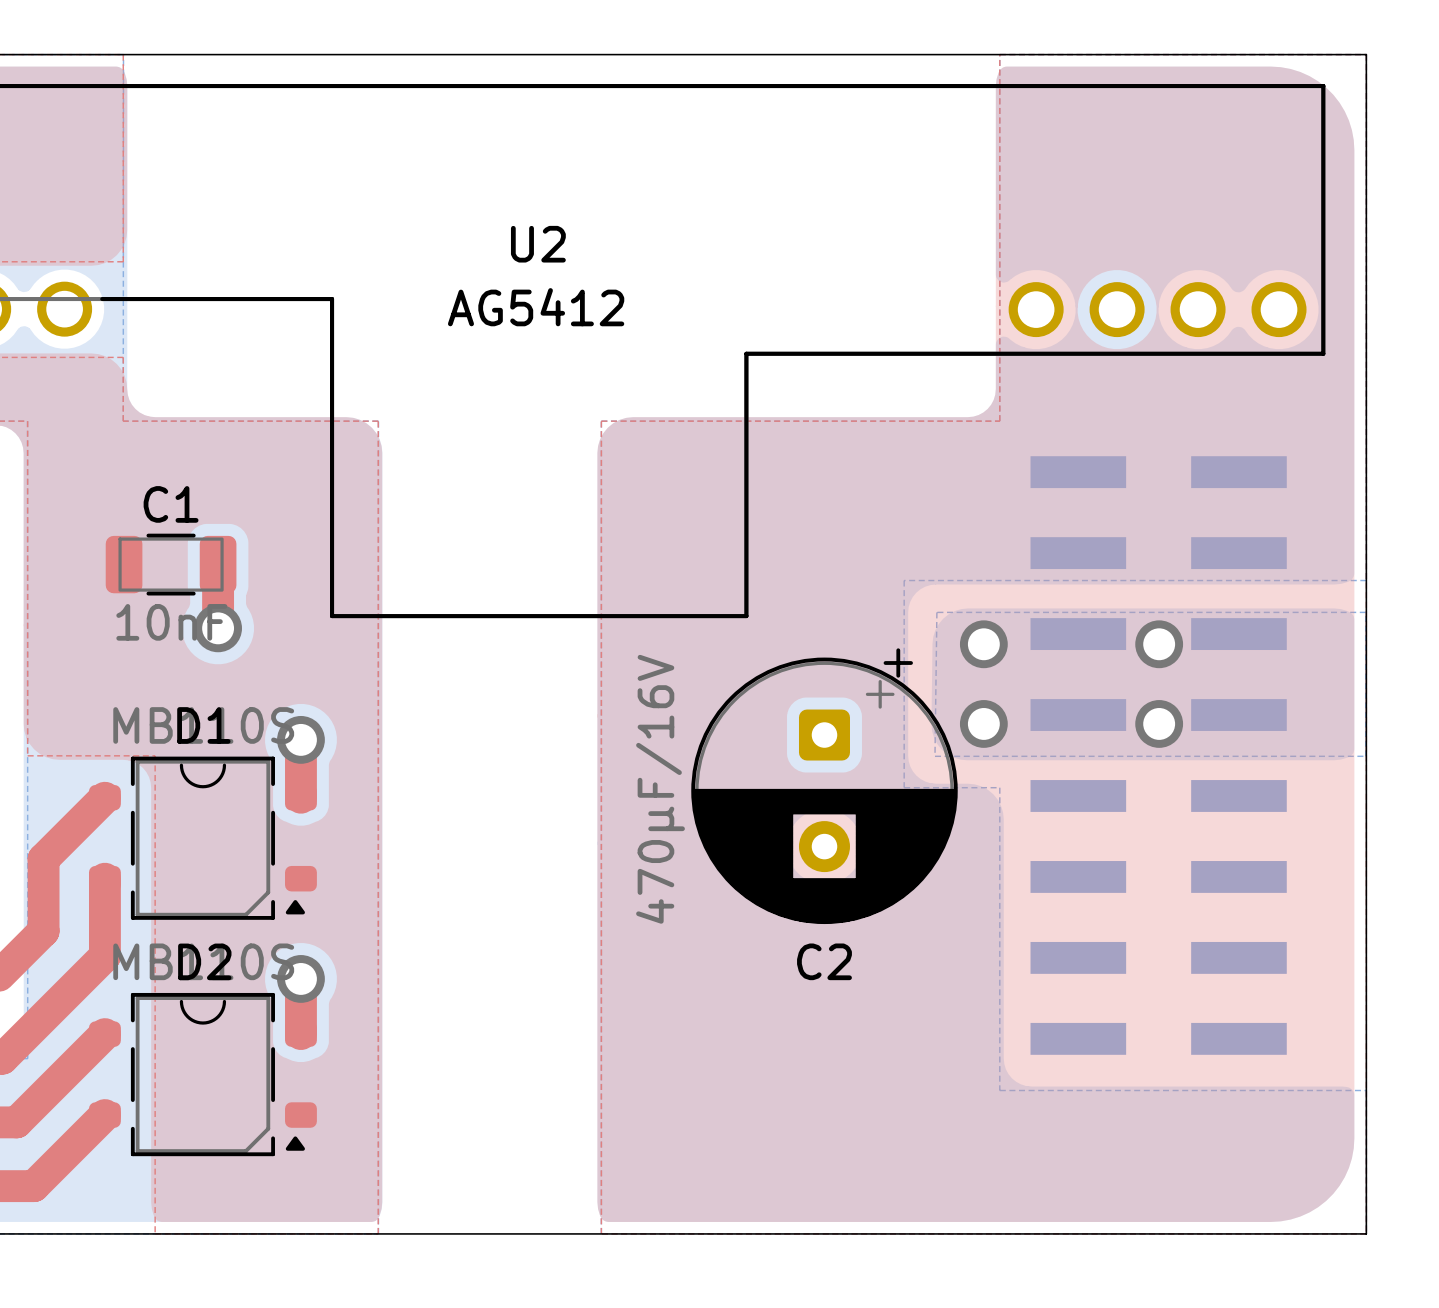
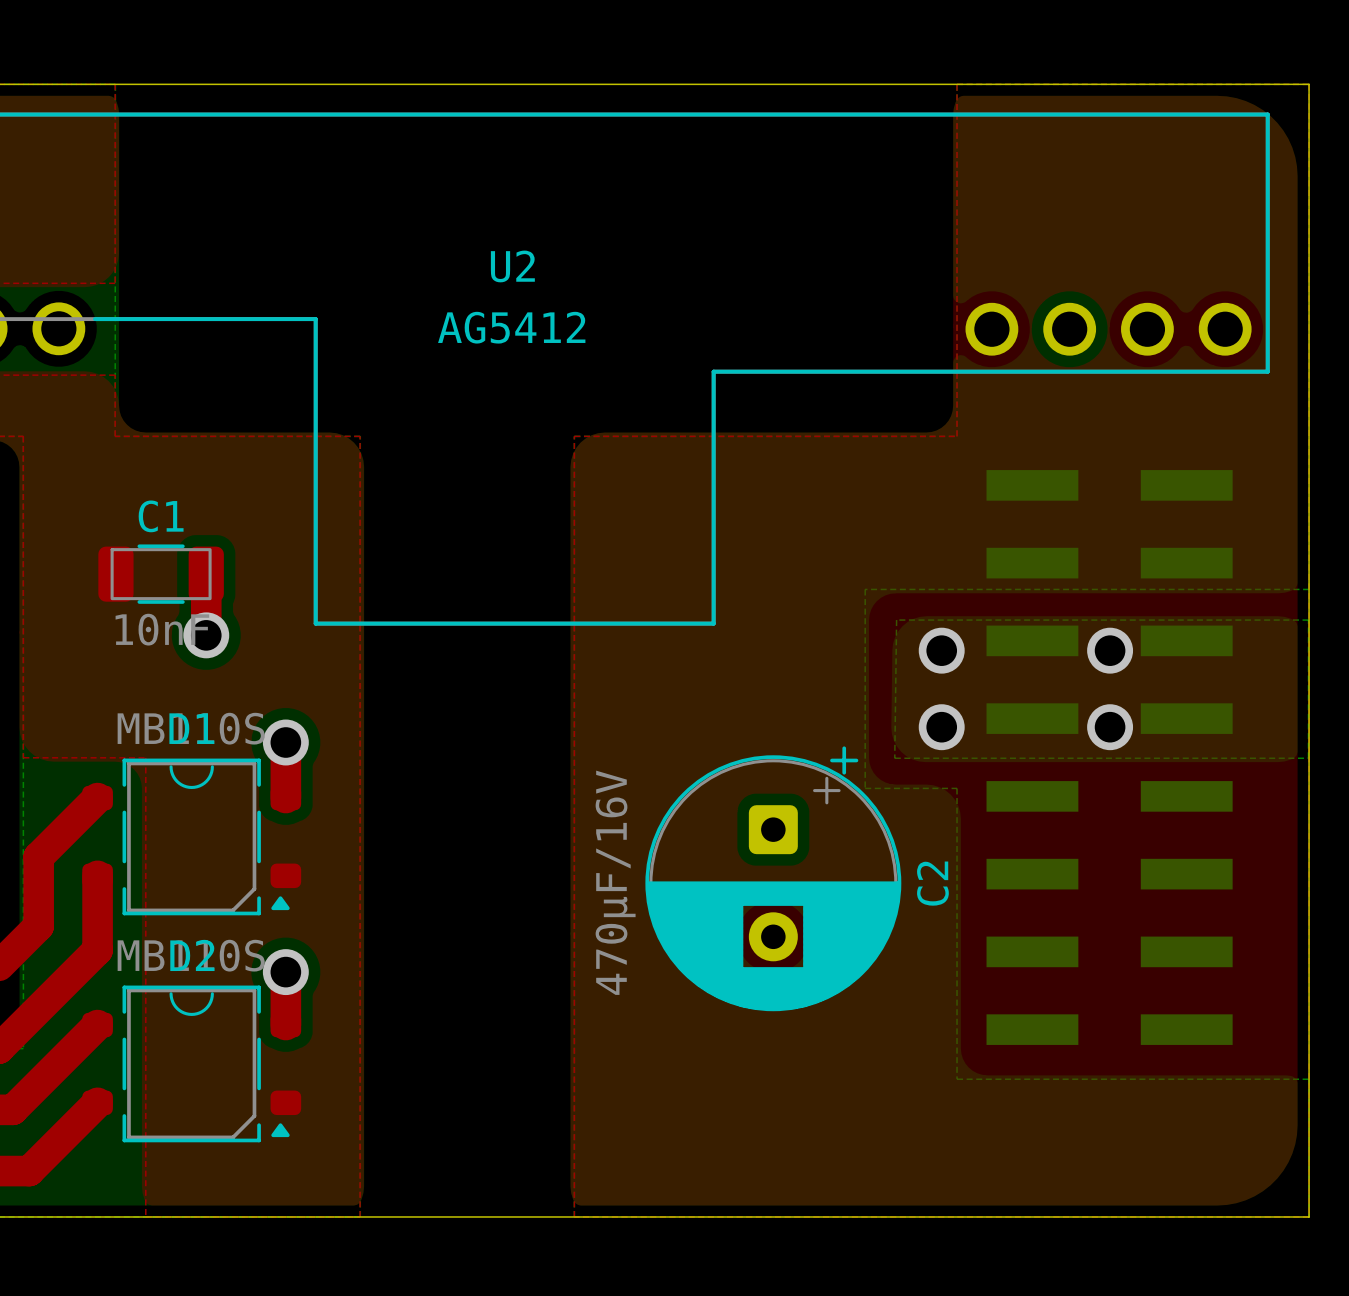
C2 position: (824, 786) -> (773, 878)
C2 name rotation: 0° (824, 961) -> 90° counterclockwise (932, 883)
C2 name position: C2 (824, 961) -> C2 (932, 883)

